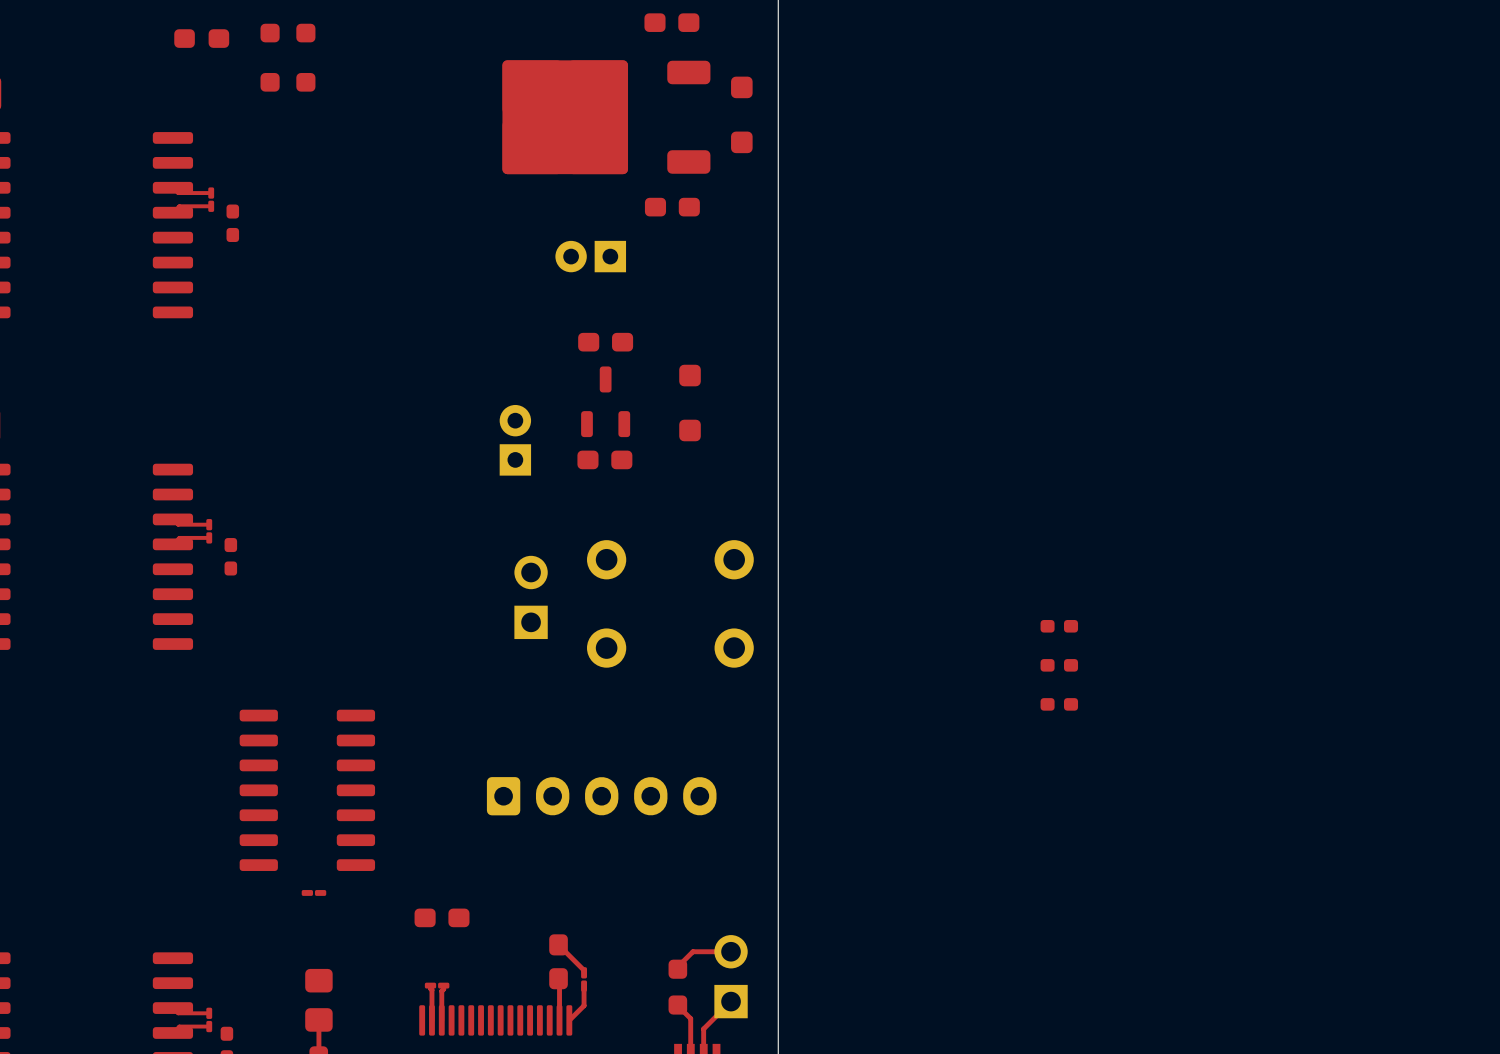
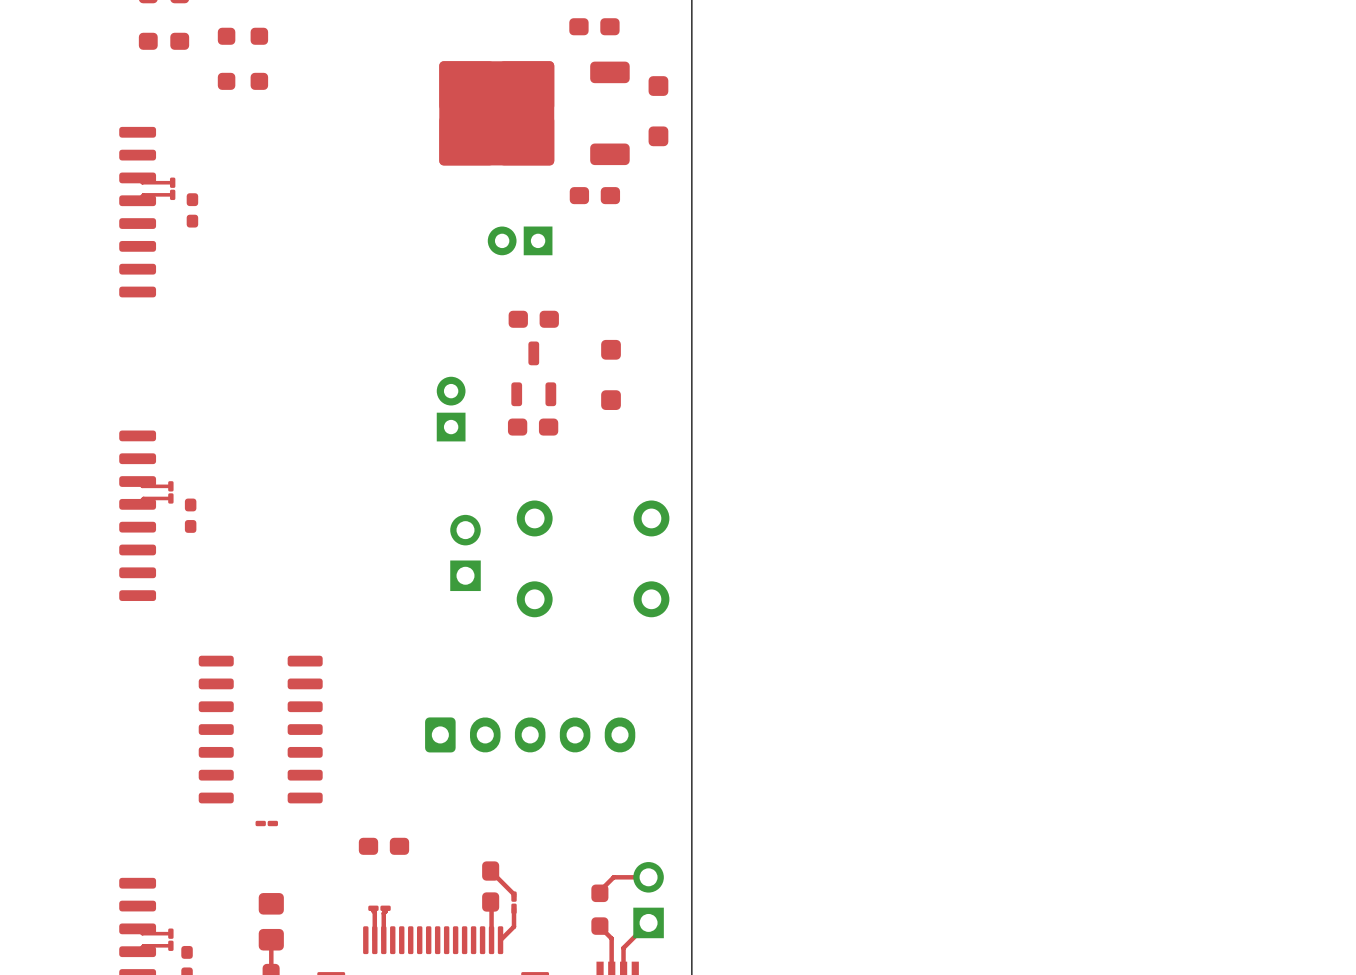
part: (1059, 626) -> none
part: (1059, 665) -> none
part: (1059, 704) -> none

